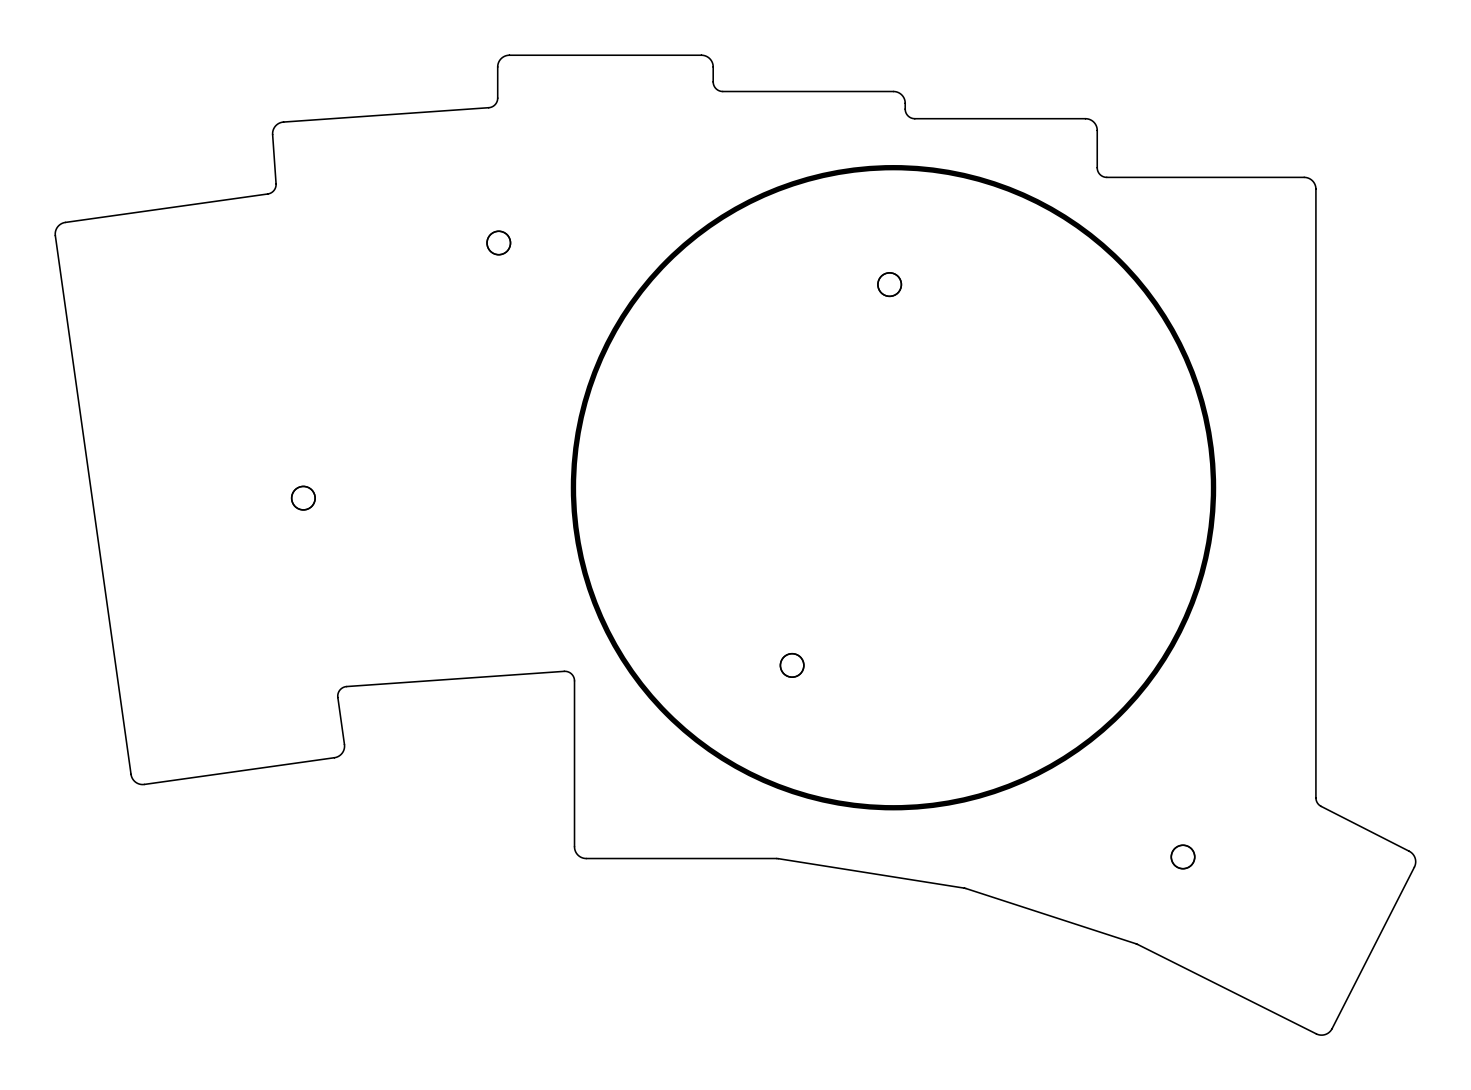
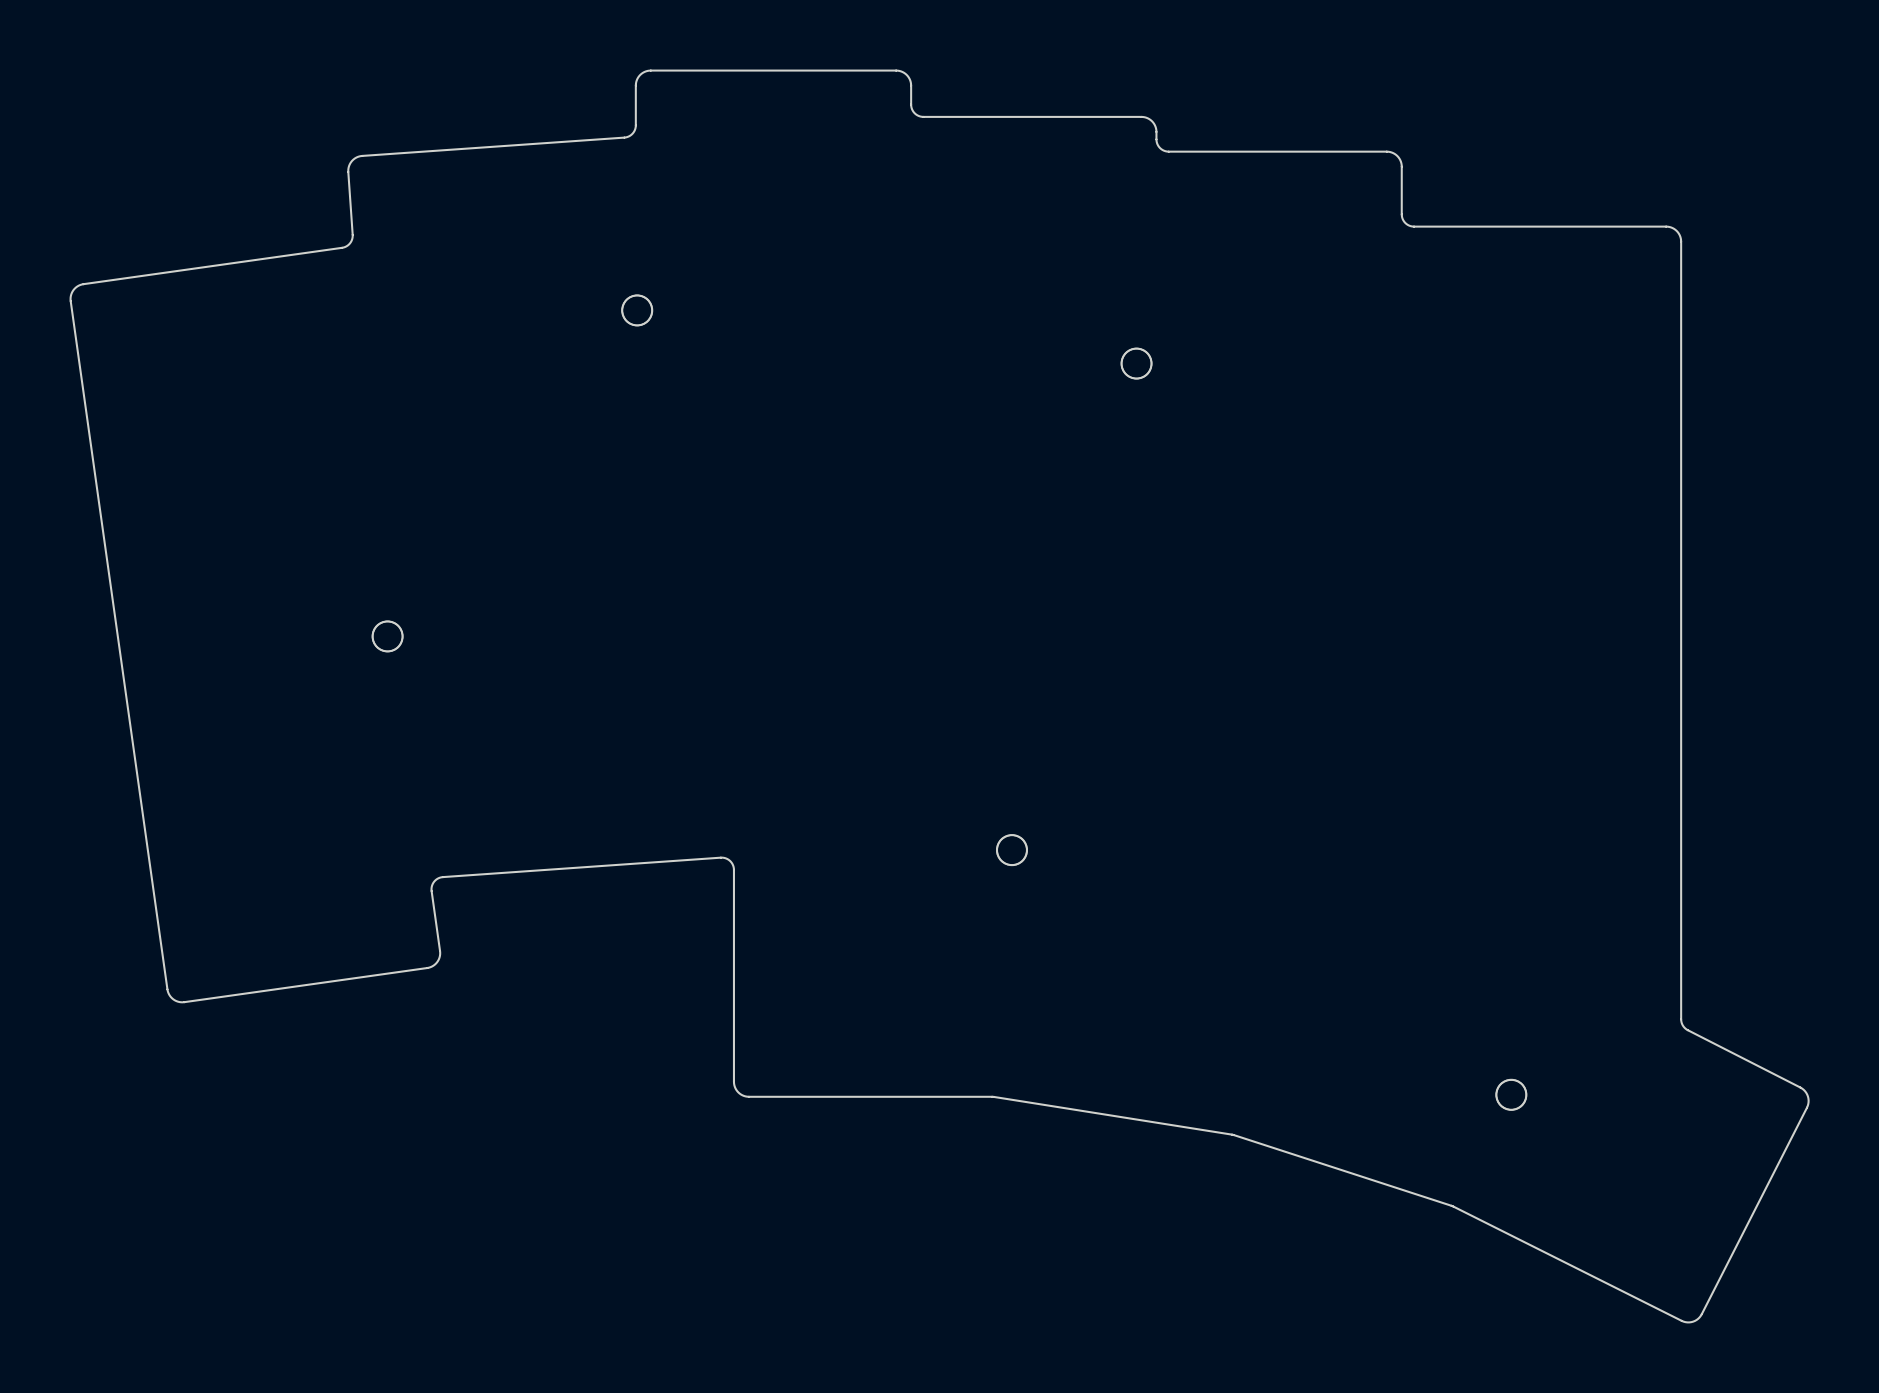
drawing: [570, 165, 1217, 811] -> none

